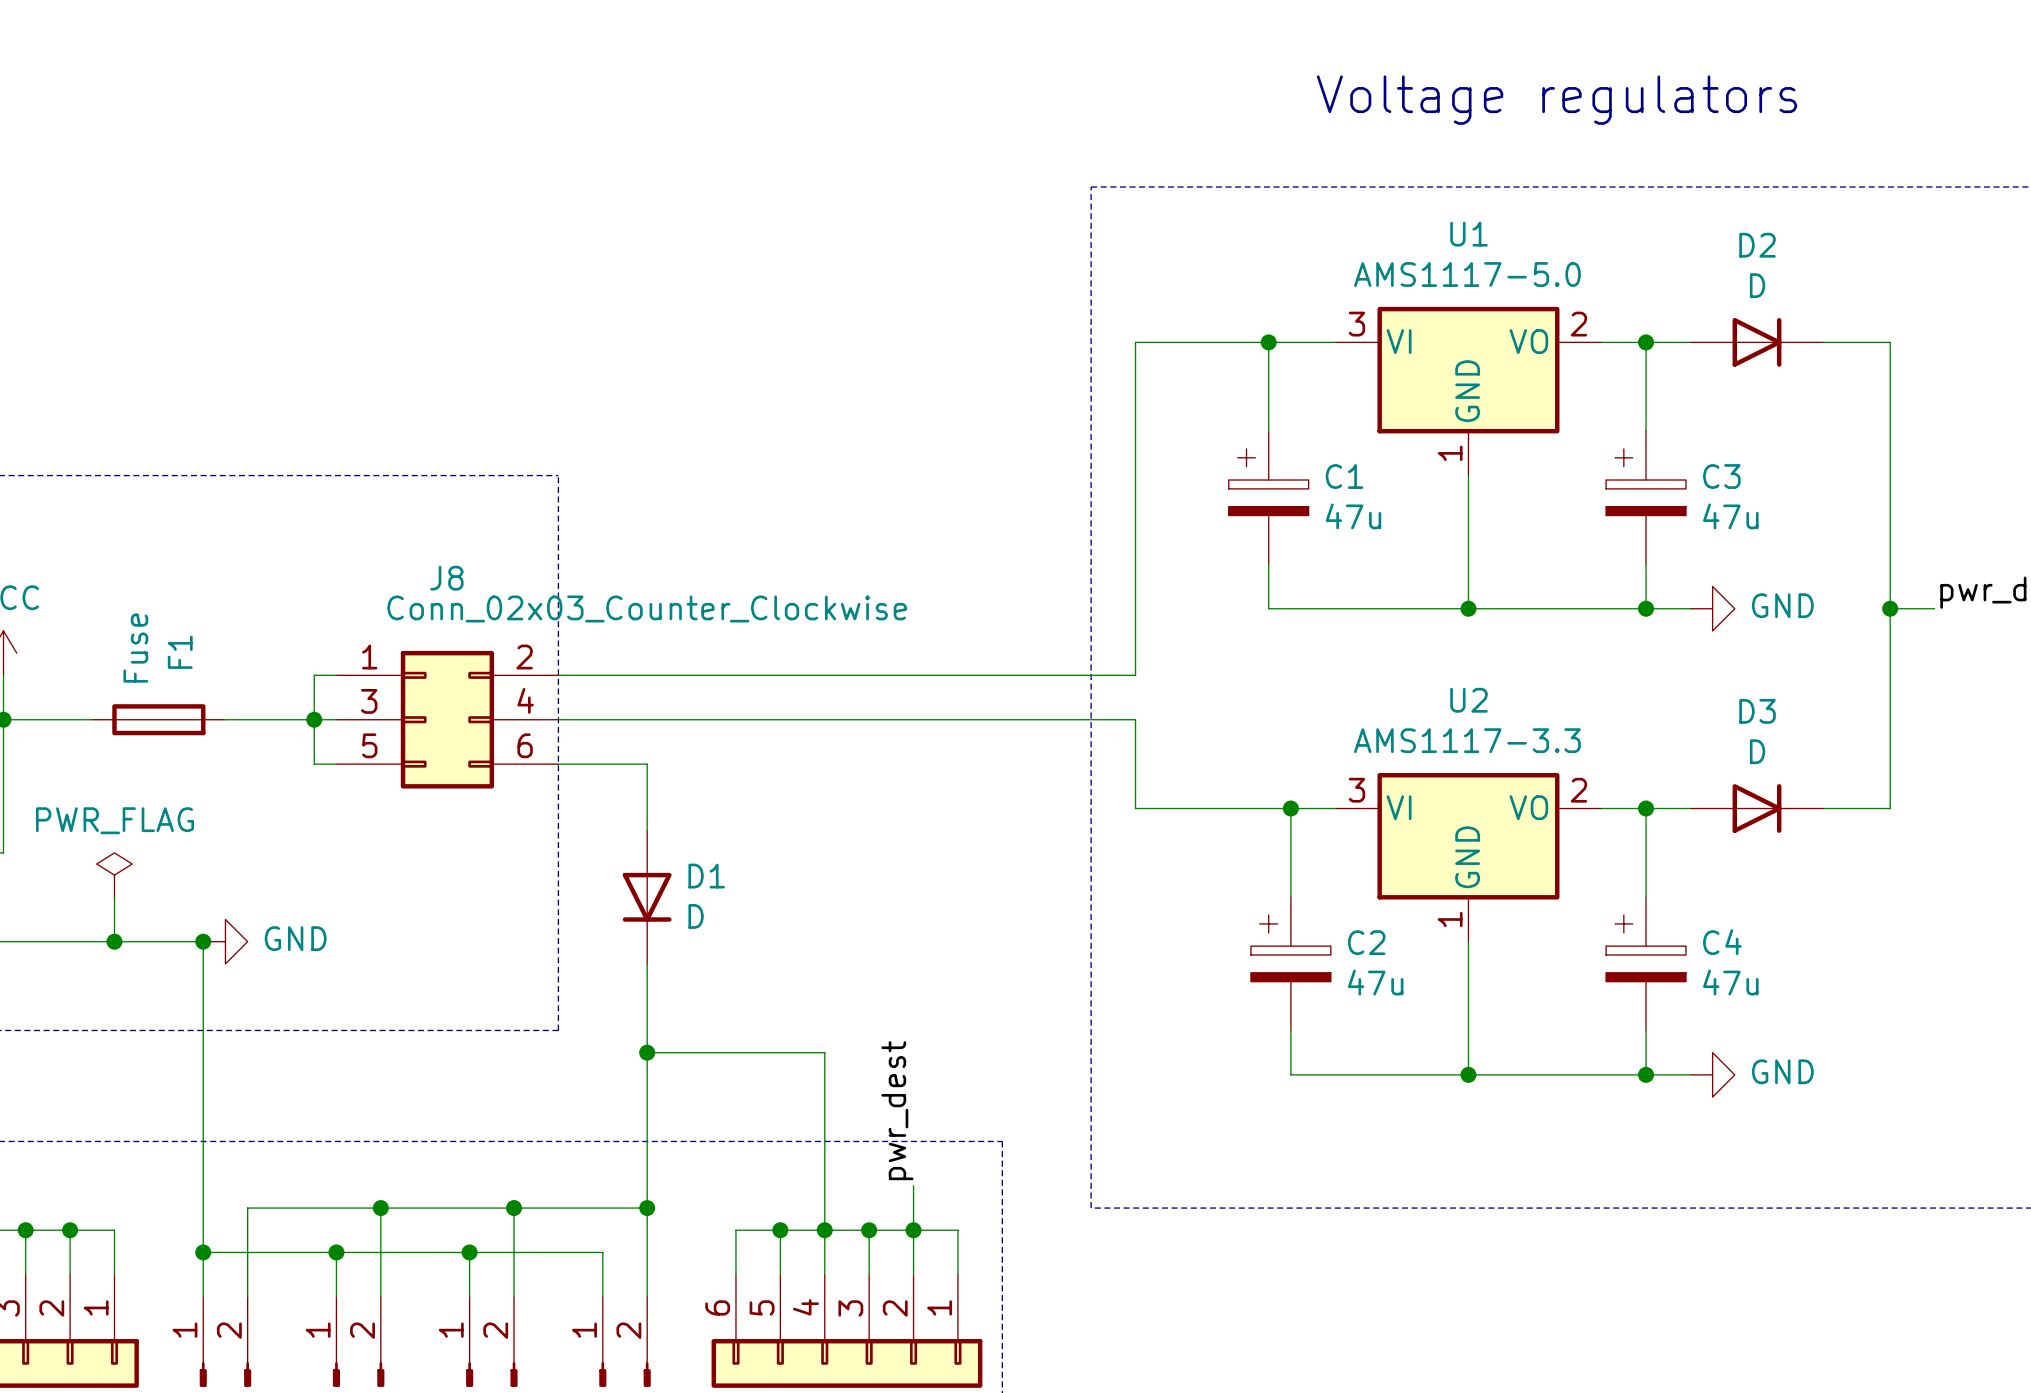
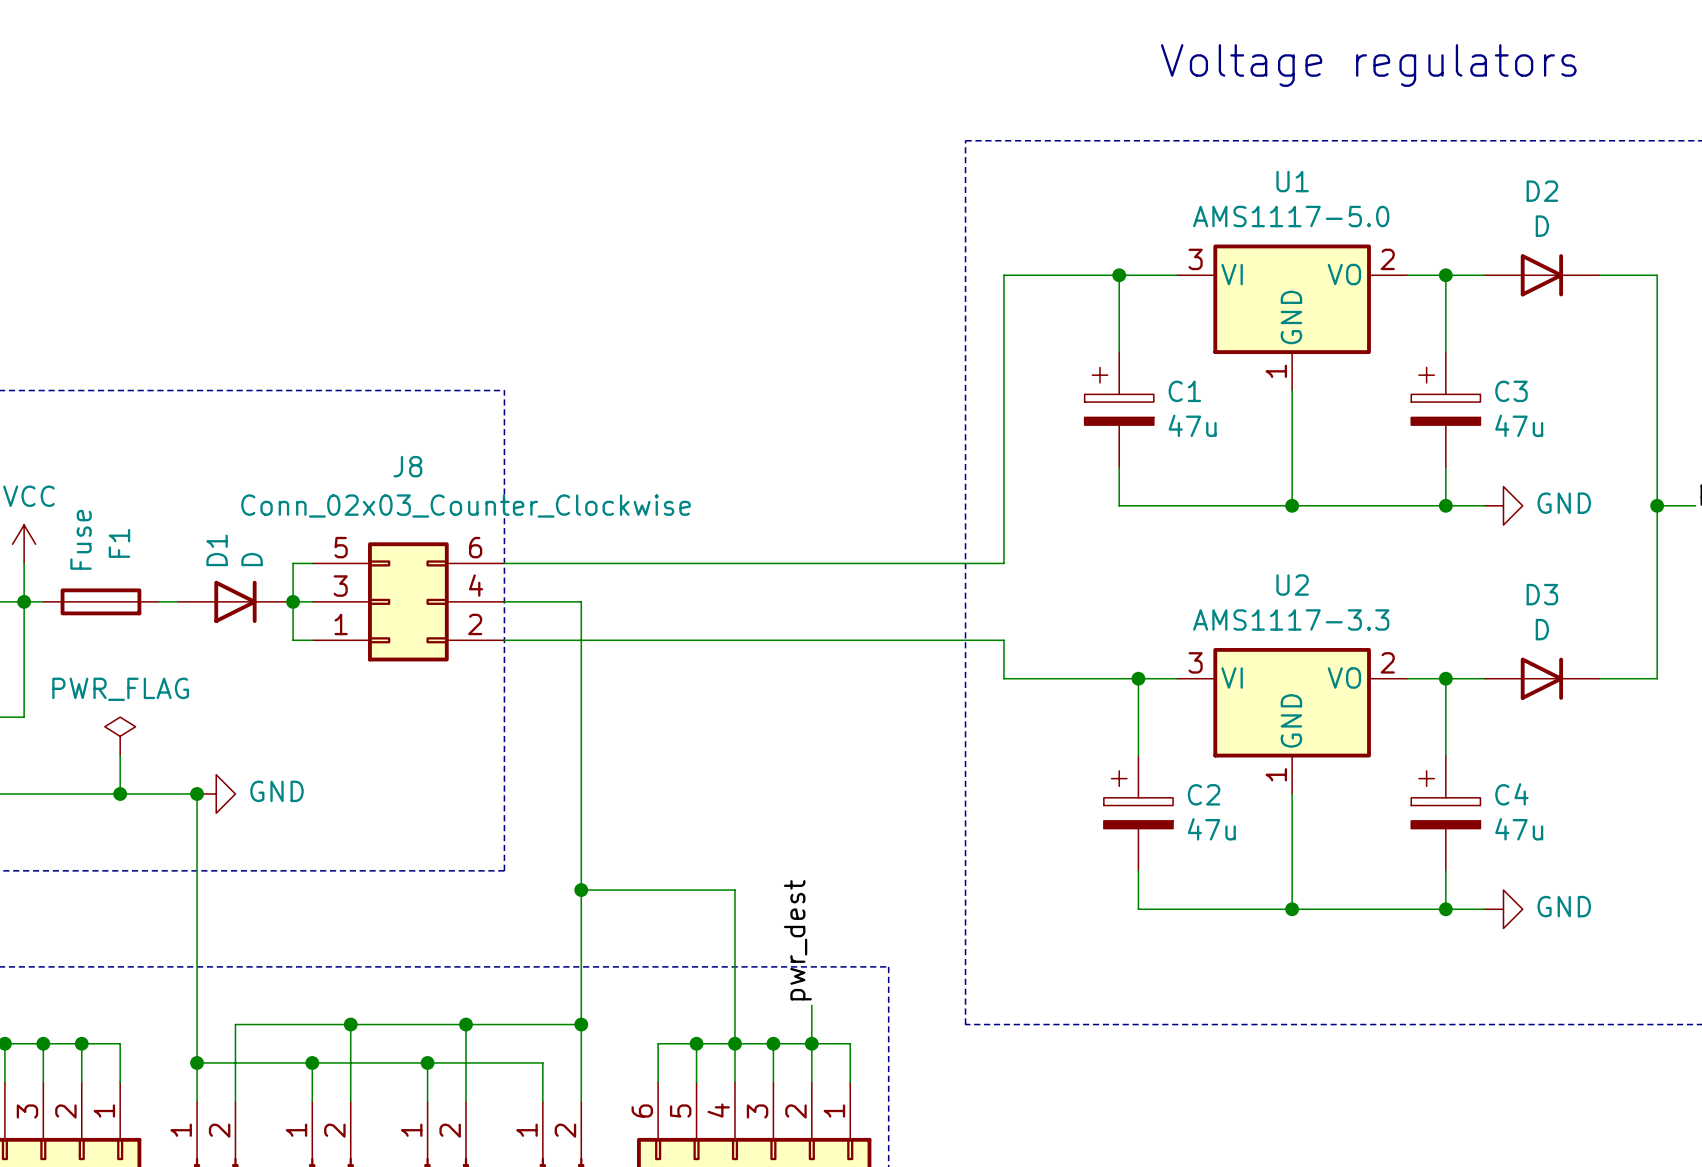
J8 value position: Conn_02x03_Counter_Clockwise (647, 608) -> Conn_02x03_Counter_Clockwise (466, 506)
F1 position: (158, 719) -> (100, 601)
J8 flip: as is (447, 719) -> up-down (408, 601)
wire: (647, 719) (1135, 719) (1135, 764) -> (581, 601) (581, 640) (1003, 640)
D1 rotation: 0° (647, 897) -> 90° counterclockwise (235, 601)
D1 position: (647, 897) -> (235, 601)

